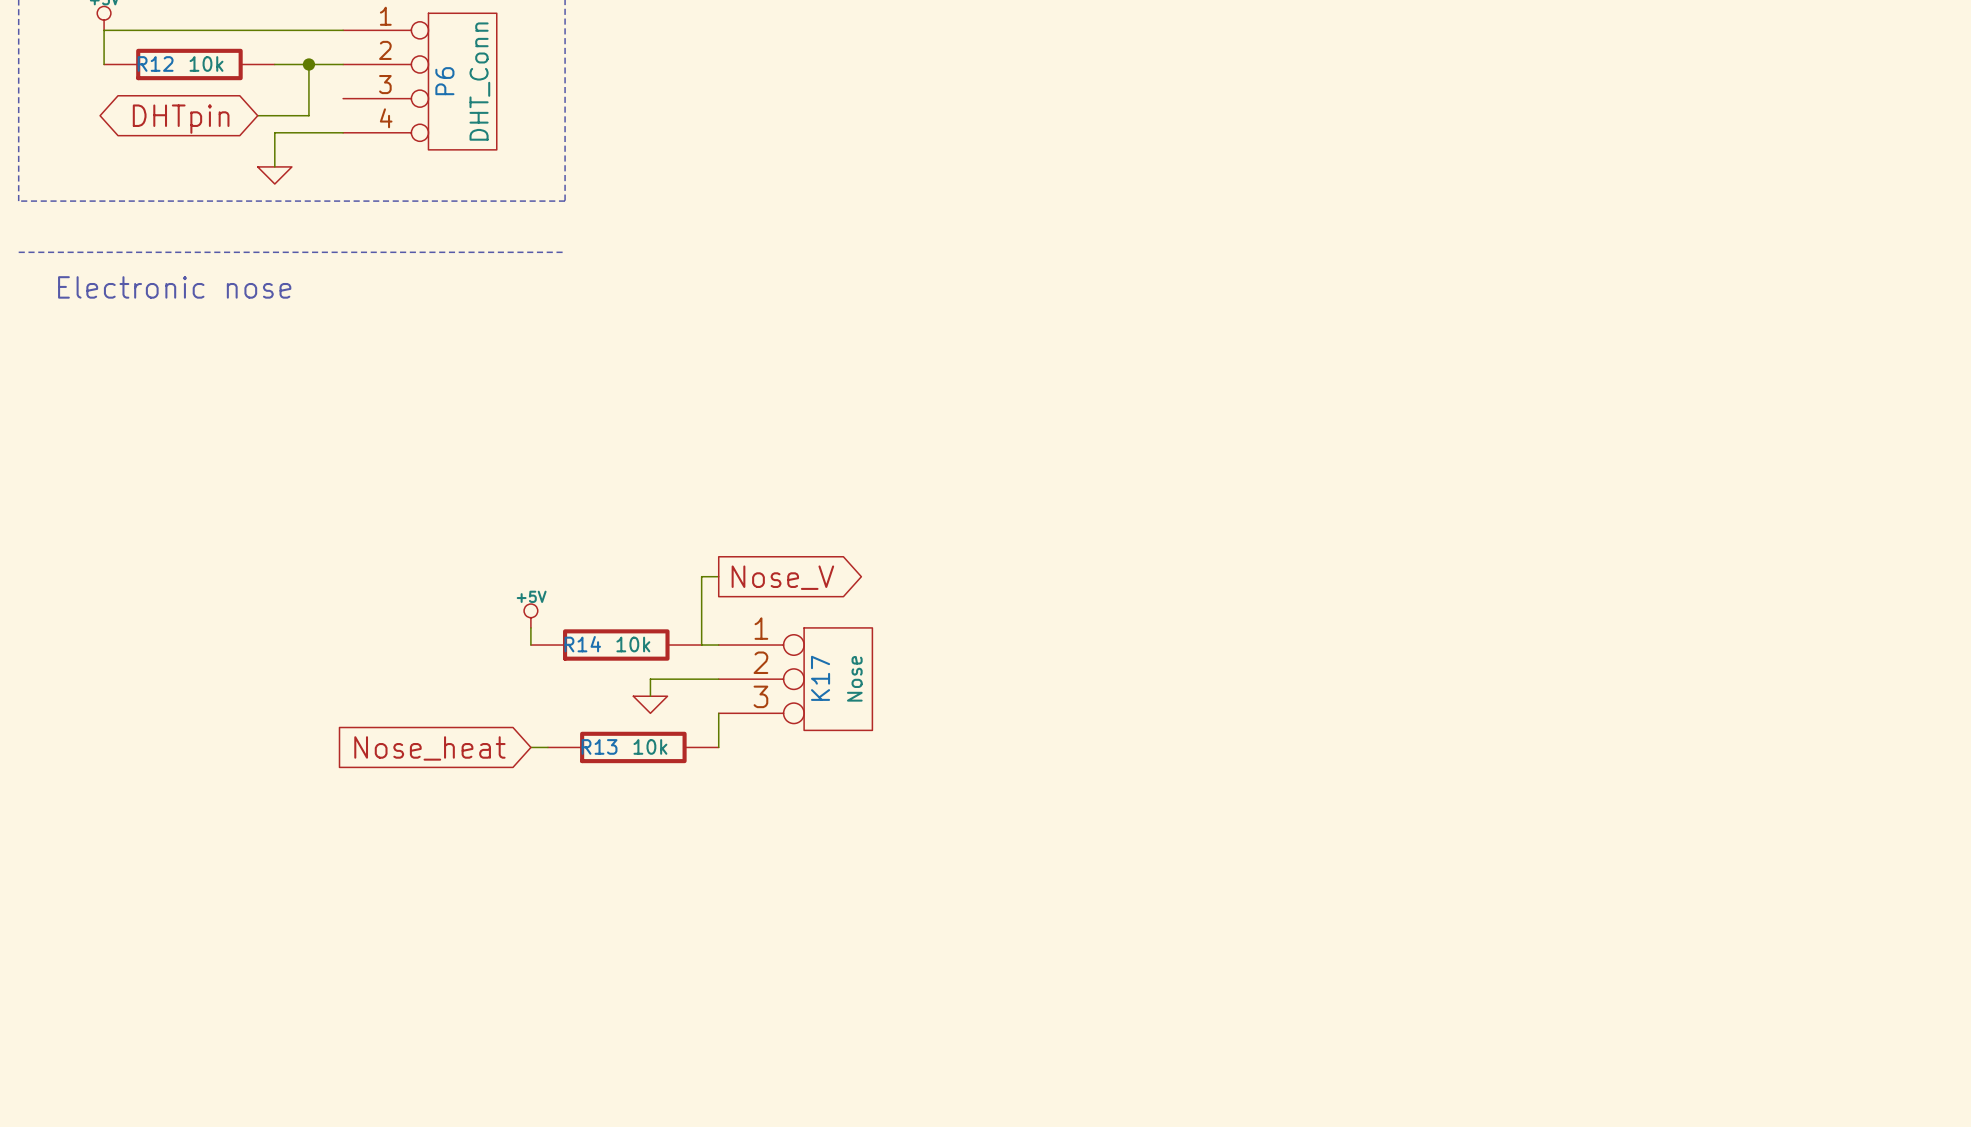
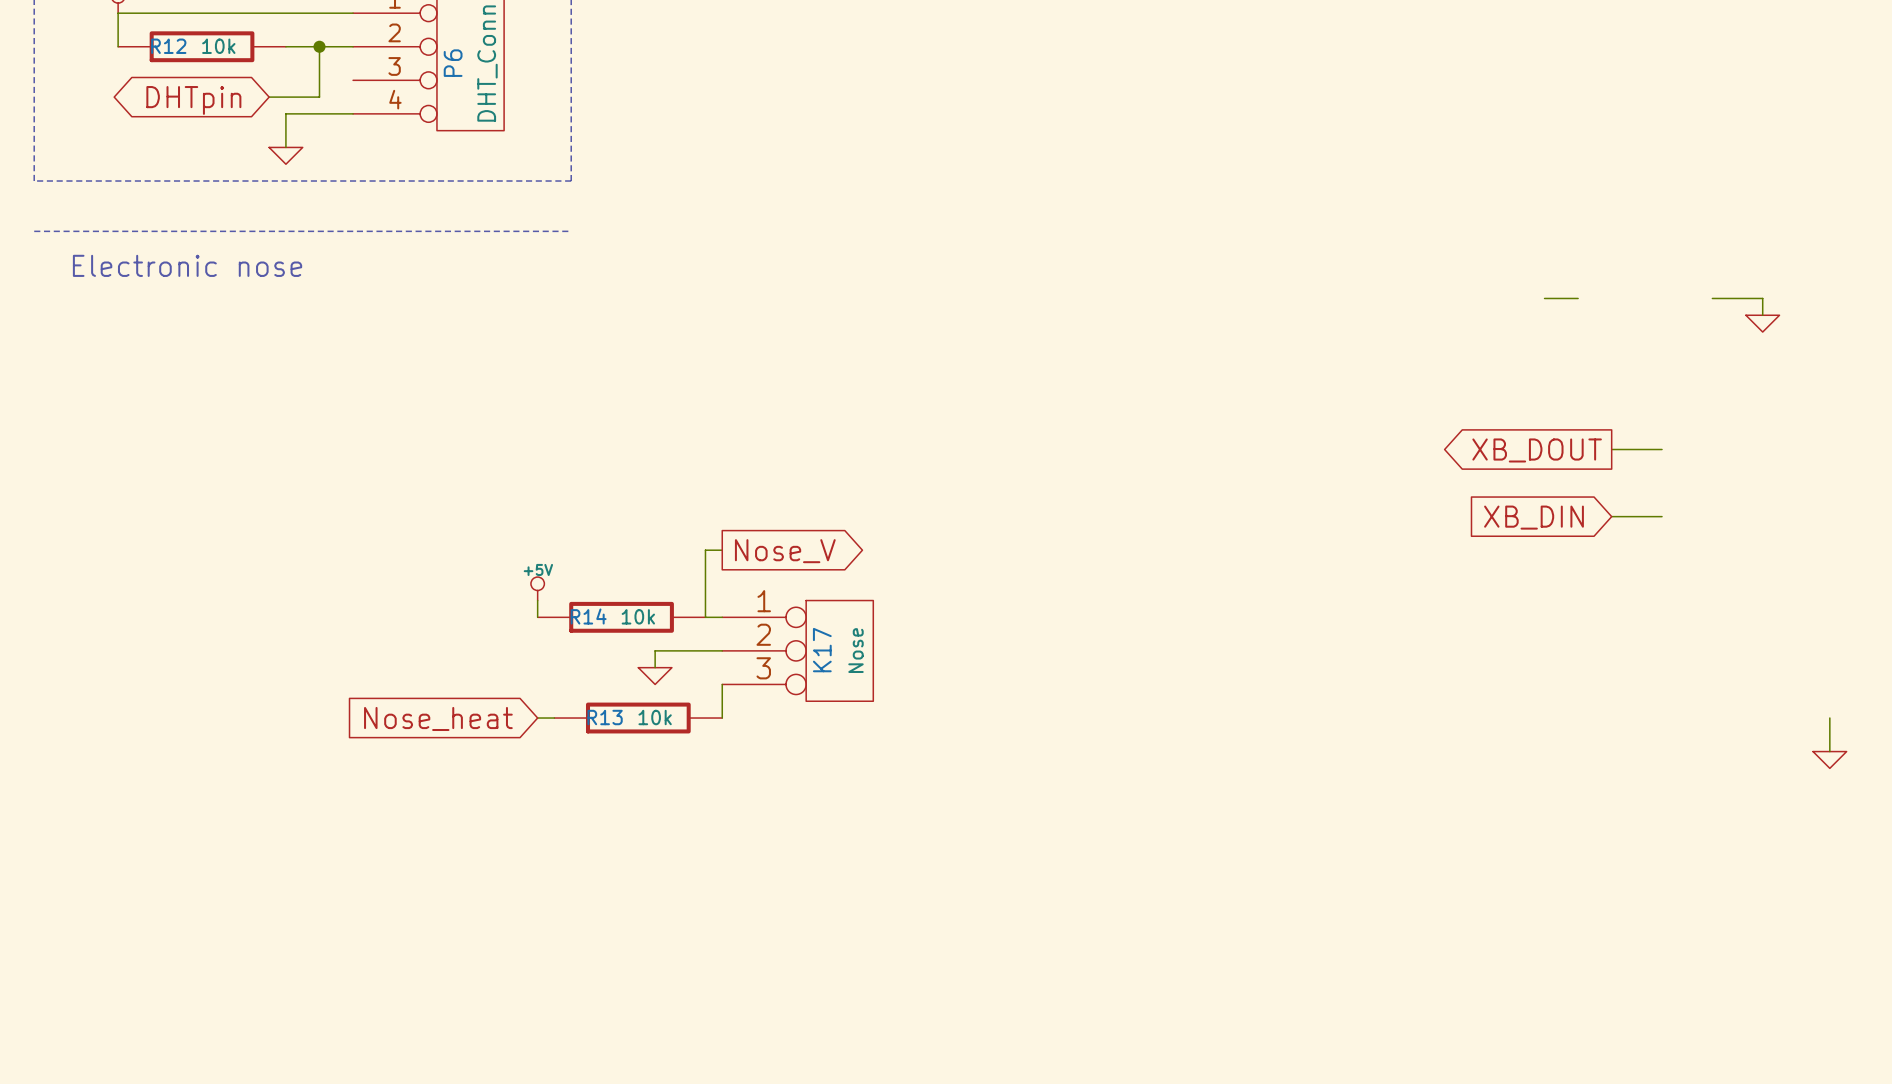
wire: none -> (1544, 298) (1578, 298)
wire: none -> (1712, 298) (1762, 298) (1762, 315)
power symbol: none -> (1762, 323)
wire: none -> (1611, 449) (1662, 449)
global label: none -> XB_DOUT (1537, 450)
wire: none -> (1611, 516) (1662, 516)
global label: none -> XB_DIN (1533, 517)
wire: none -> (1829, 718) (1829, 751)
power symbol: none -> (1829, 759)

